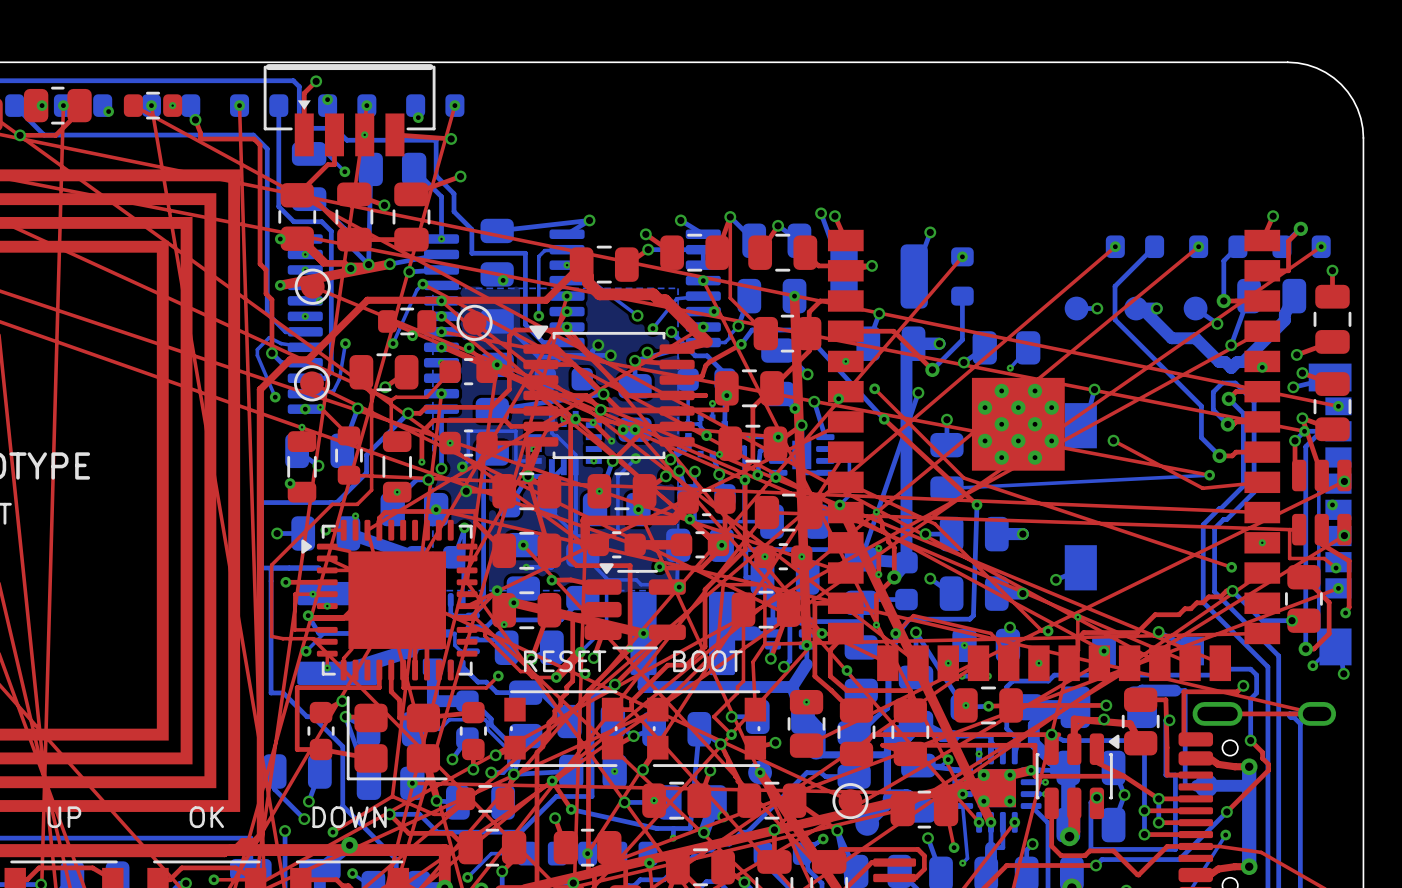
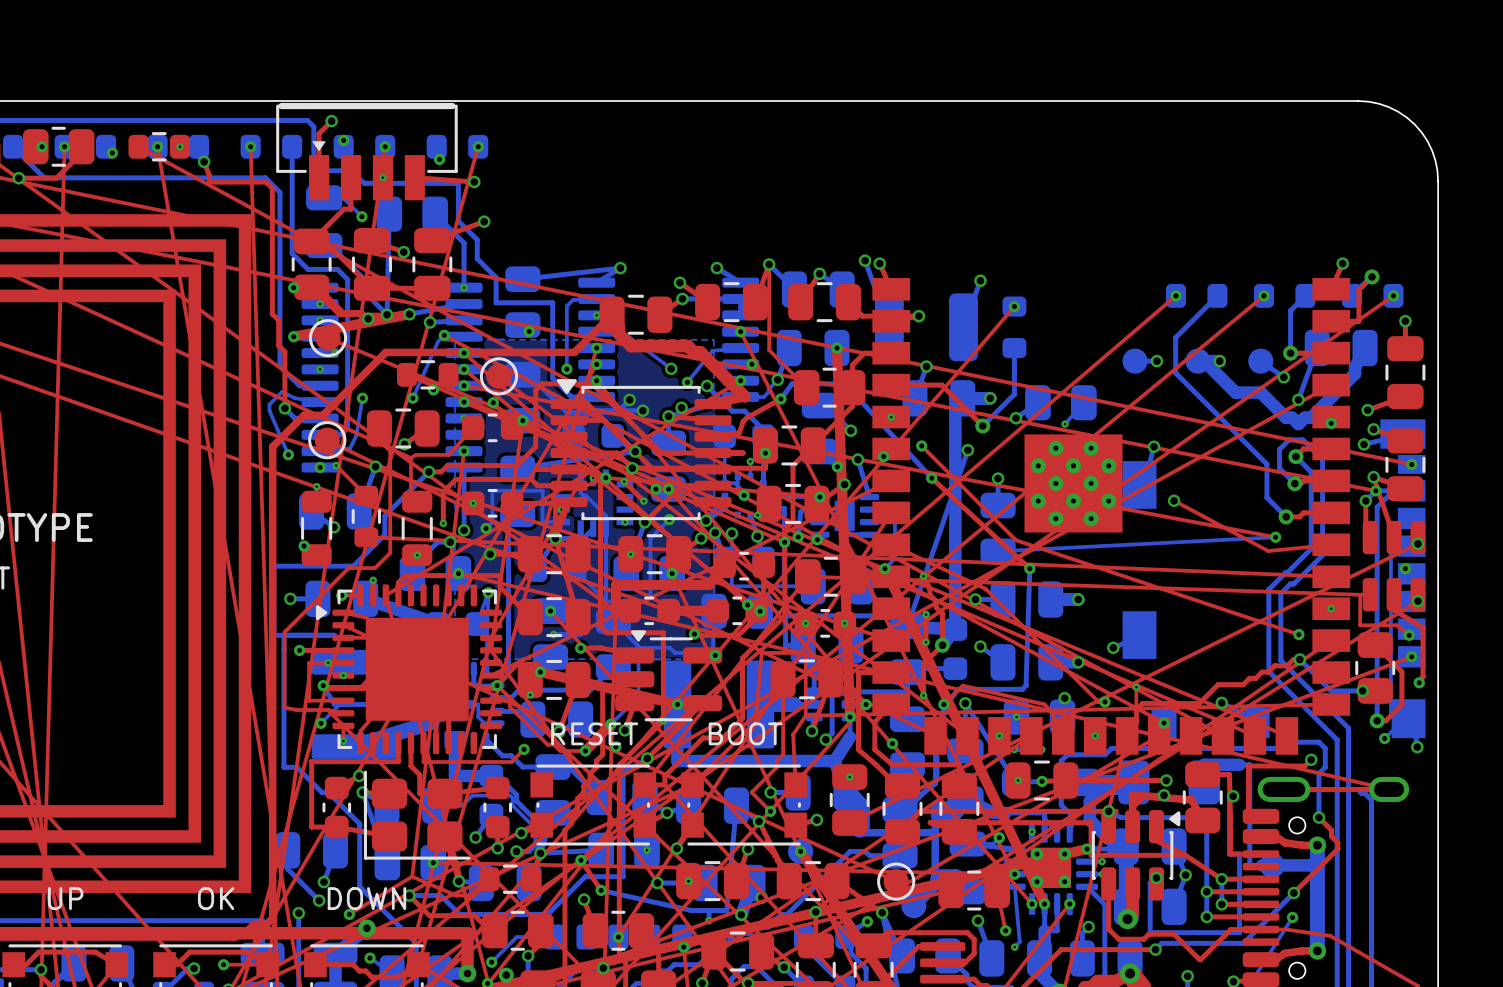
via position: (689, 519) -> (747, 605)
via position: (497, 590) -> (497, 685)

